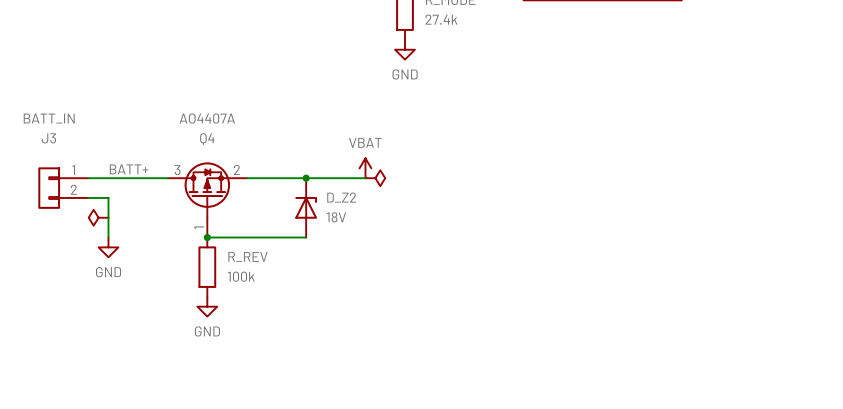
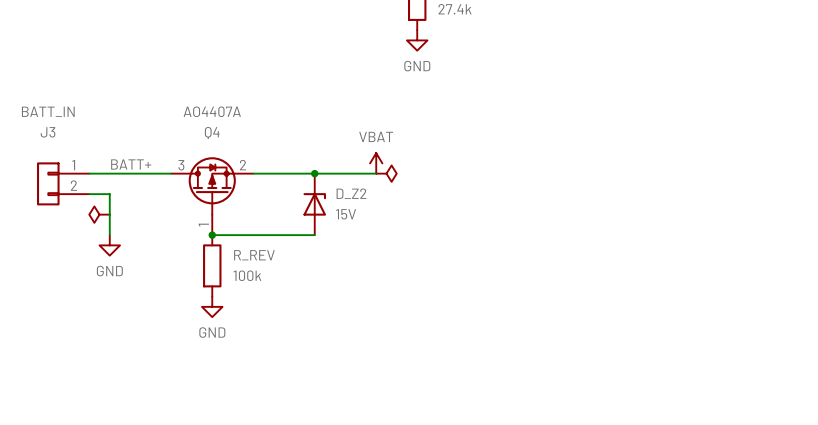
D_Z2 value: 18V (336, 217) -> 15V (346, 214)

